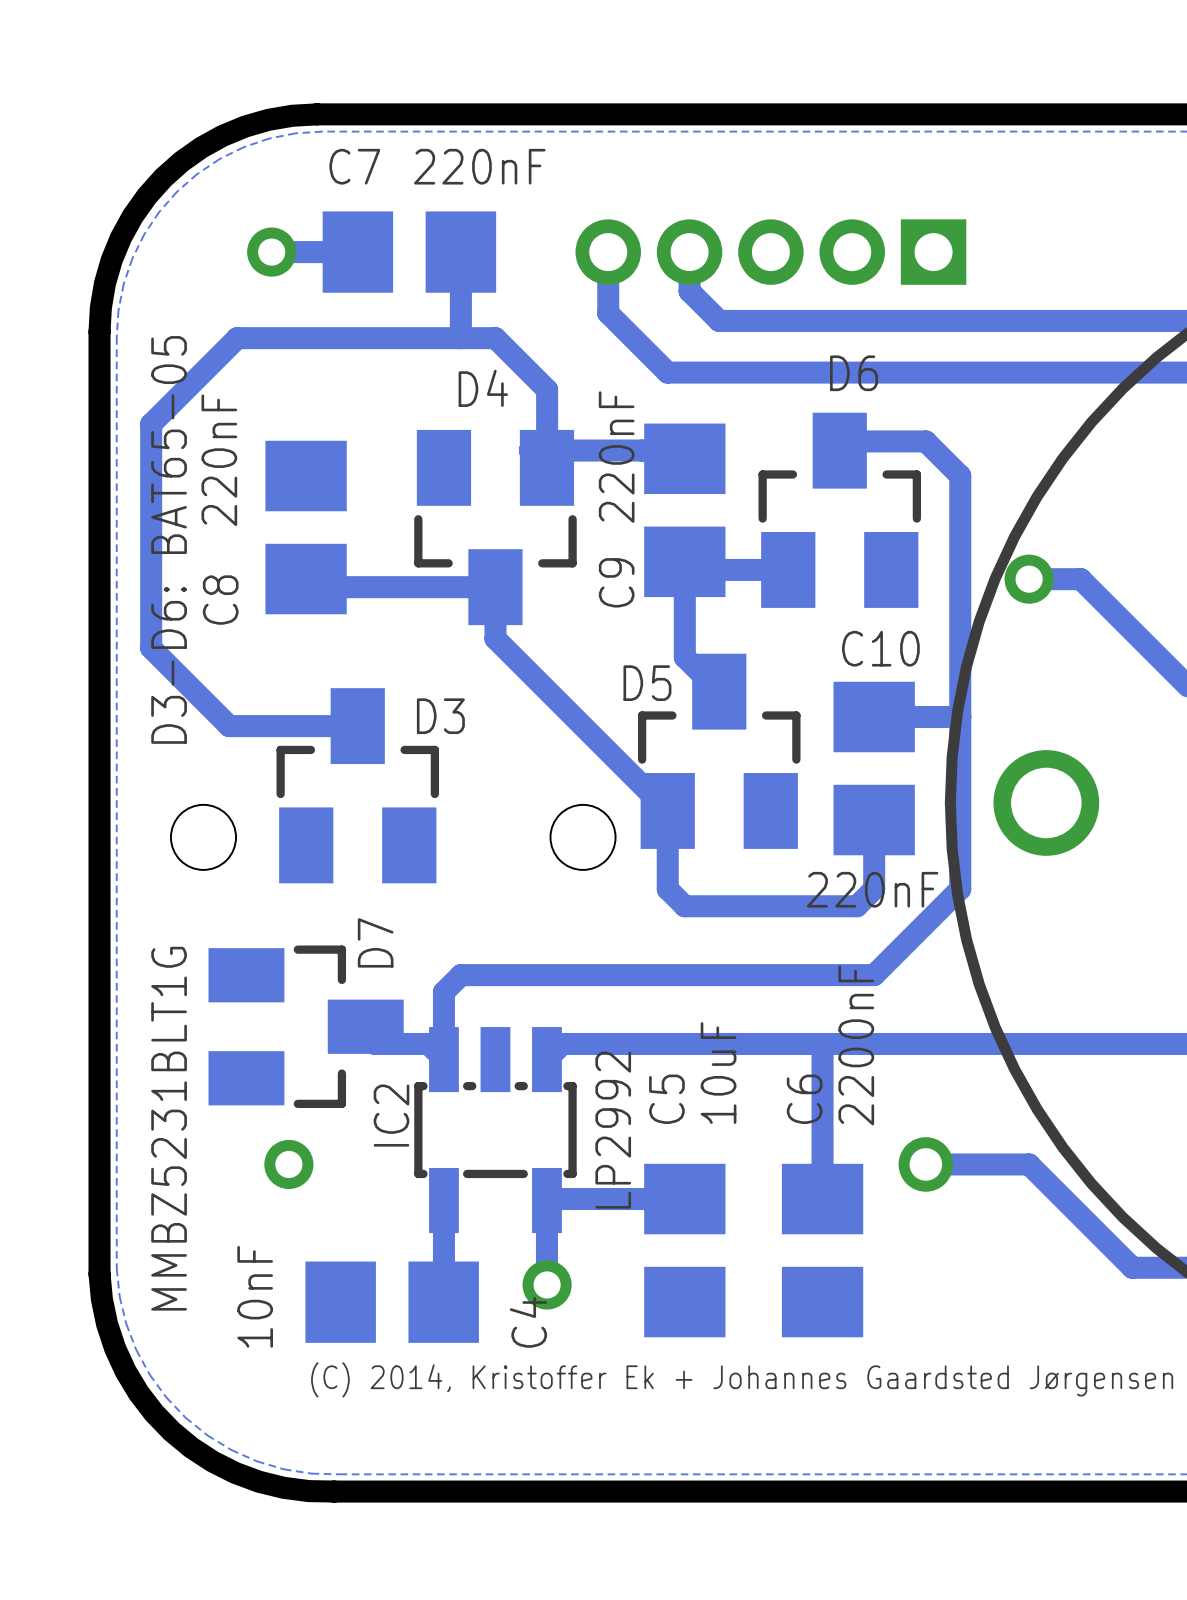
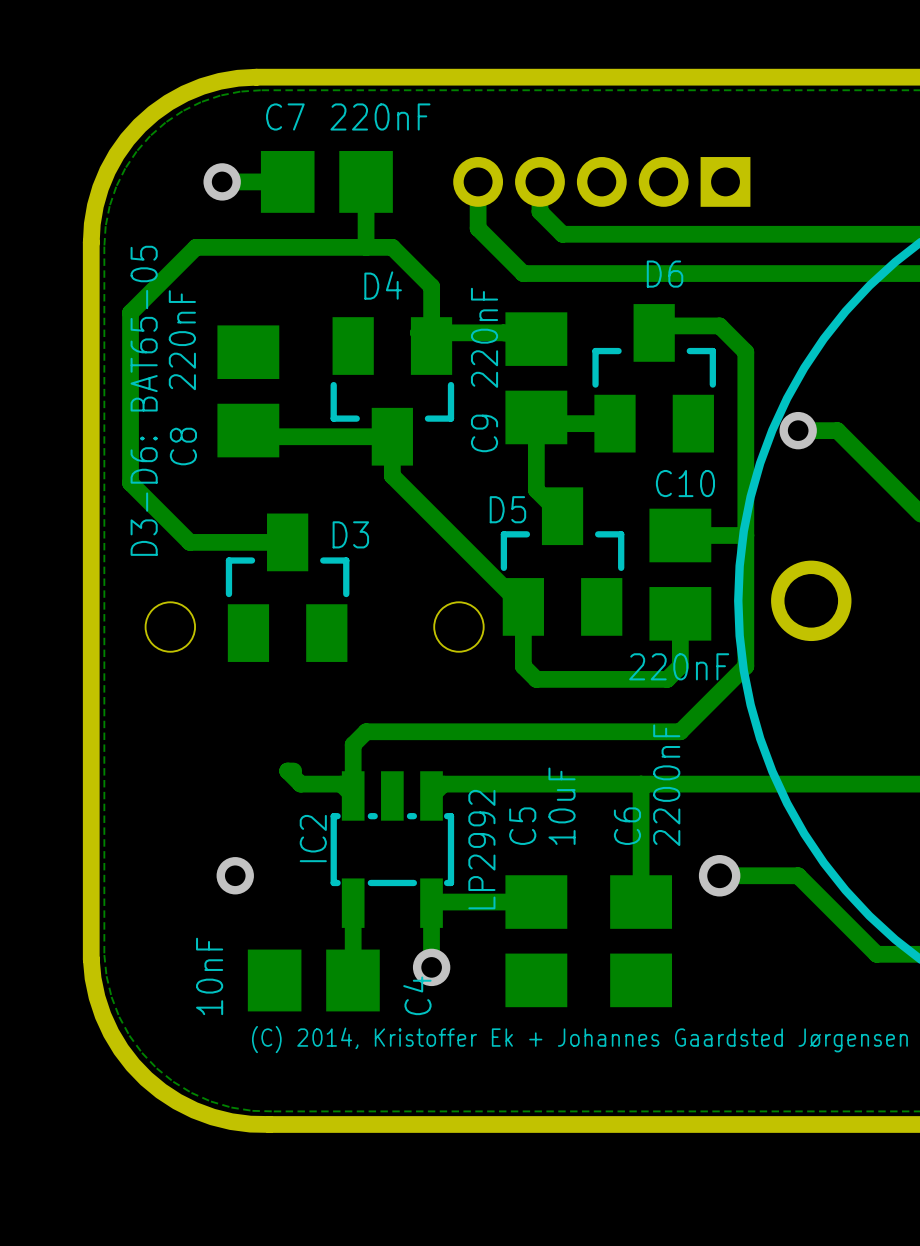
D7: MMBZ5231BLT1G (306, 1026) -> none

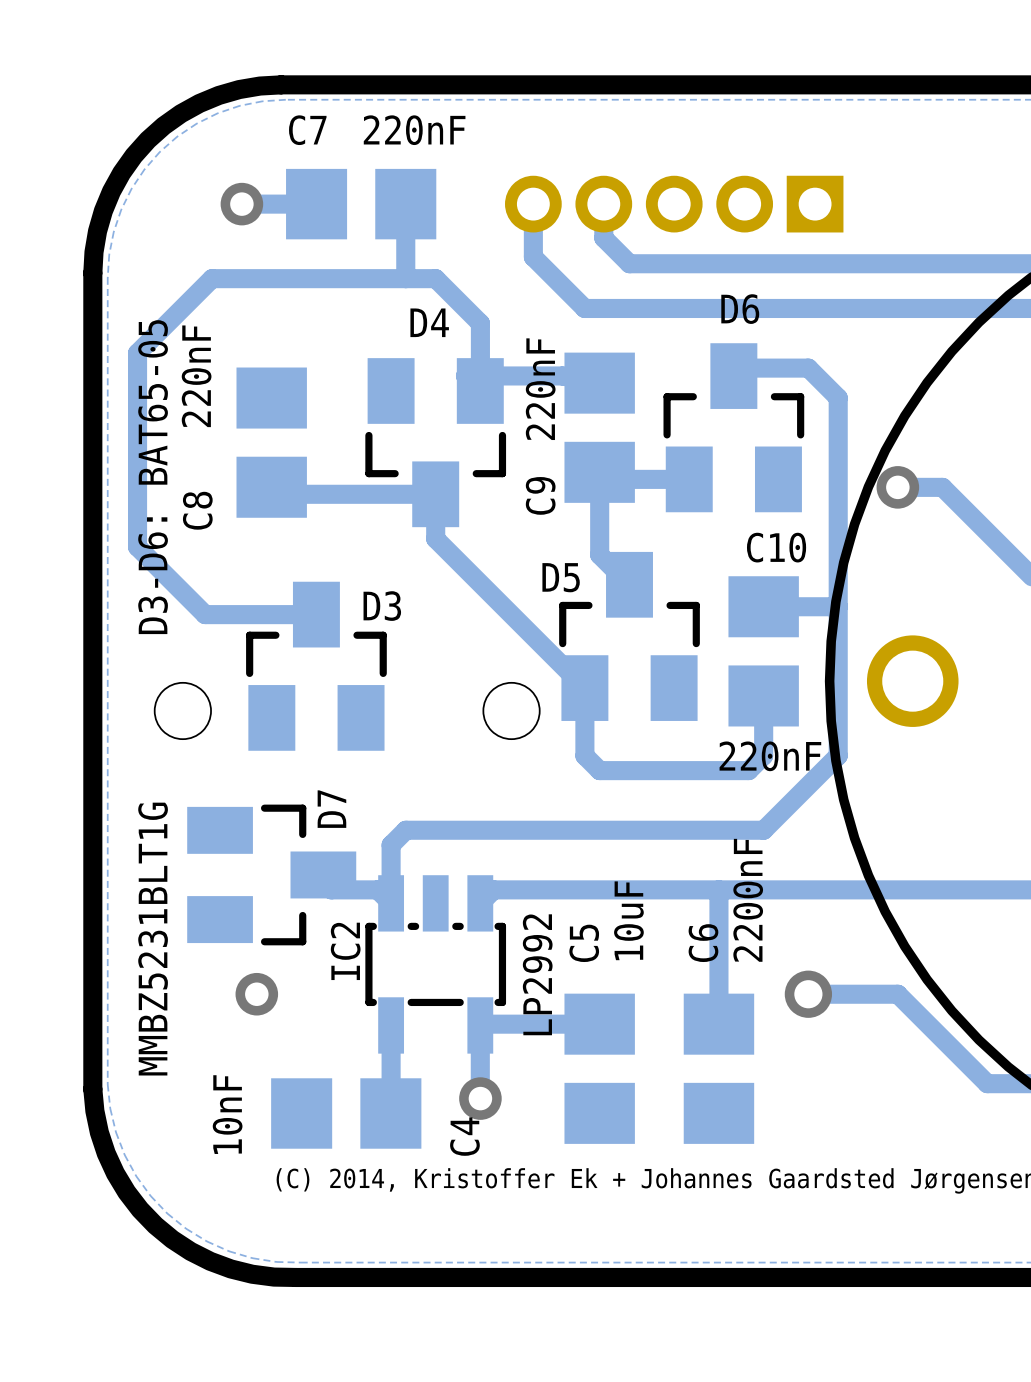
D7: none -> MMBZ5231BLT1G (271, 874)

